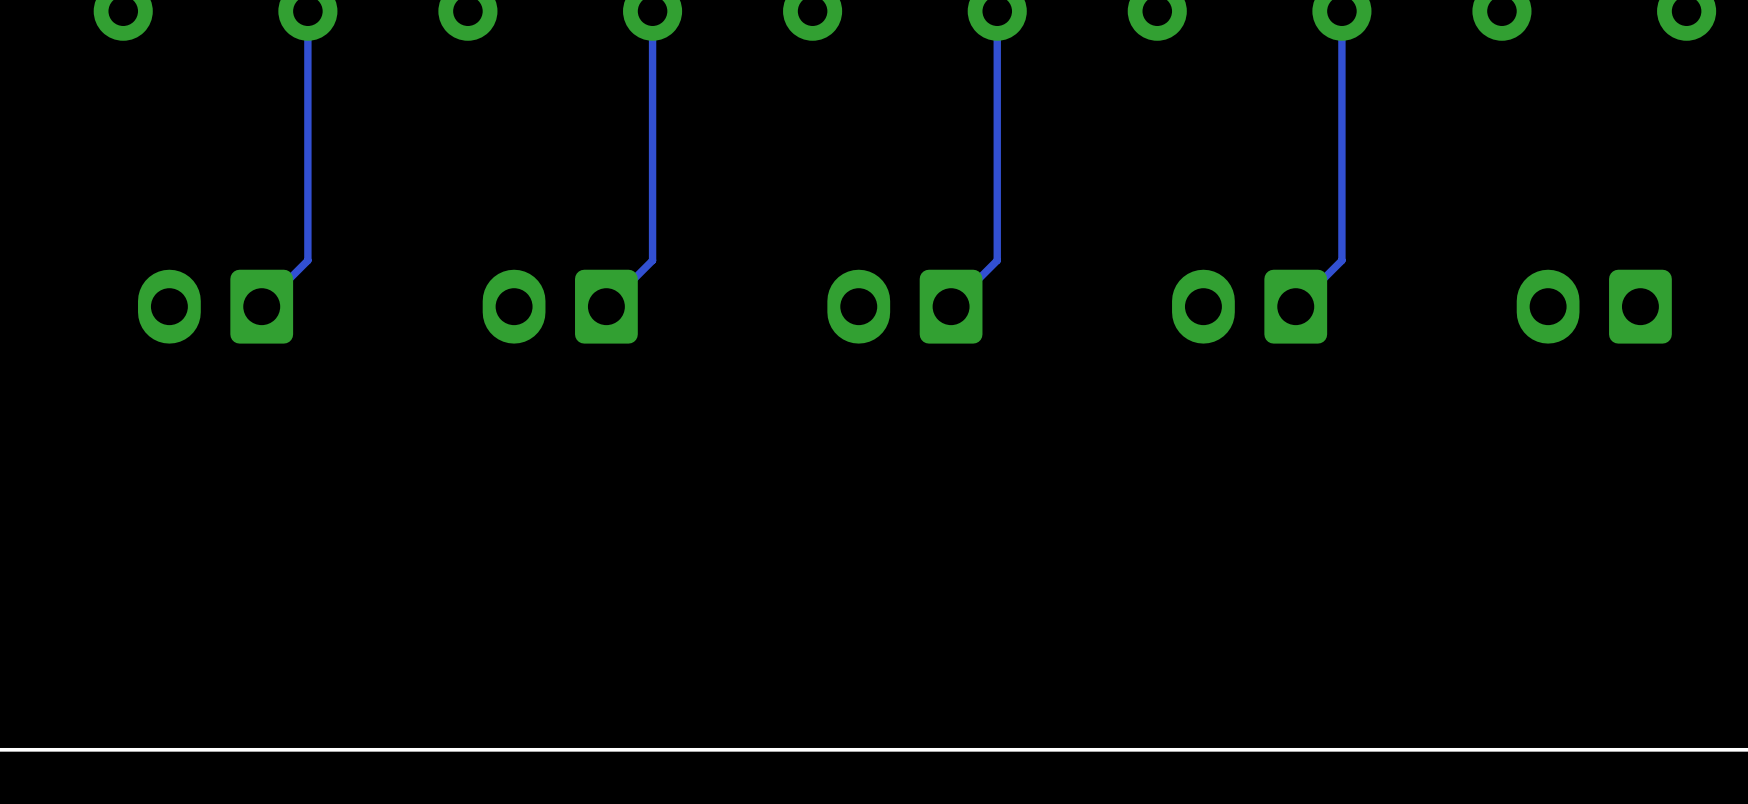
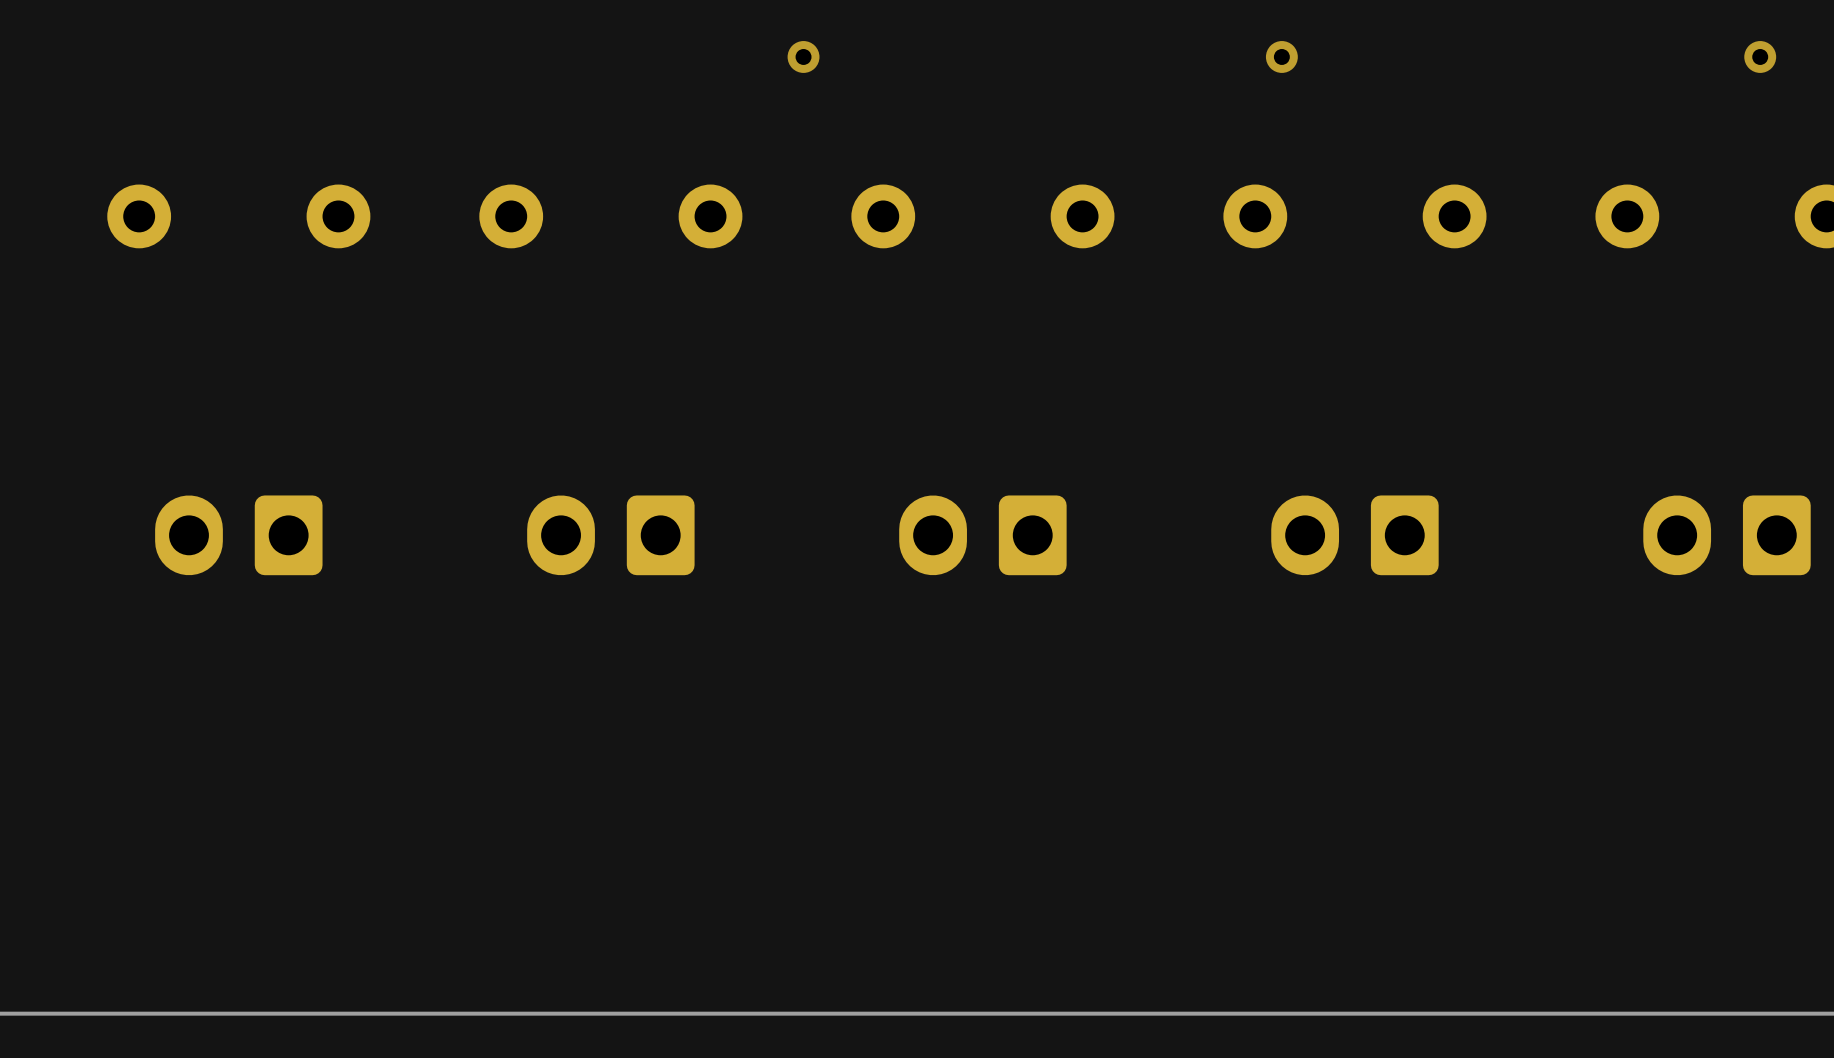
track: (307, 11) (307, 260) (261, 306) -> none
track: (652, 11) (652, 260) (606, 306) -> none
track: (997, 11) (997, 260) (951, 306) -> none
track: (1341, 11) (1341, 260) (1295, 306) -> none

